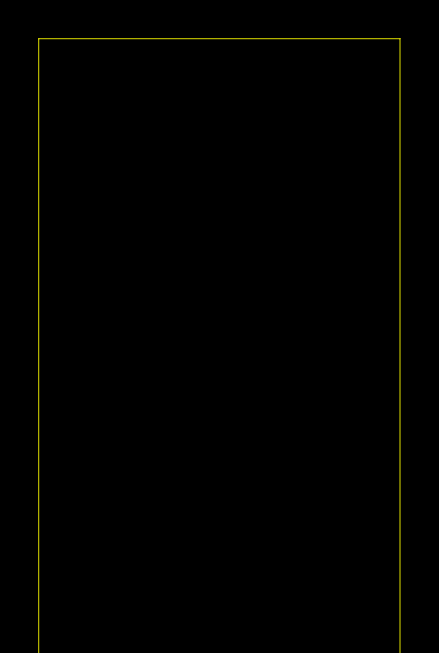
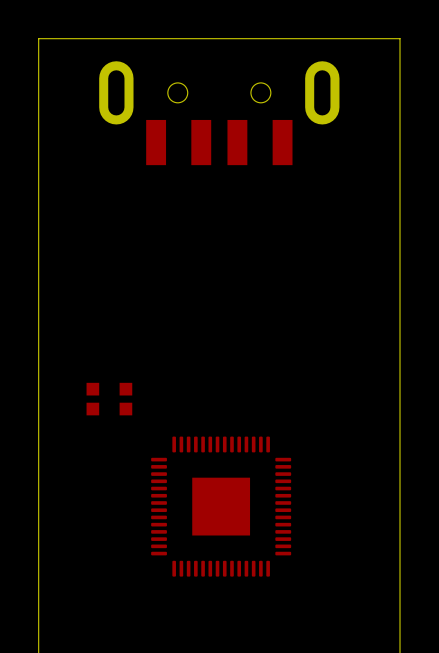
part: none -> (219, 113)
part: none -> (109, 399)
part: none -> (221, 506)

